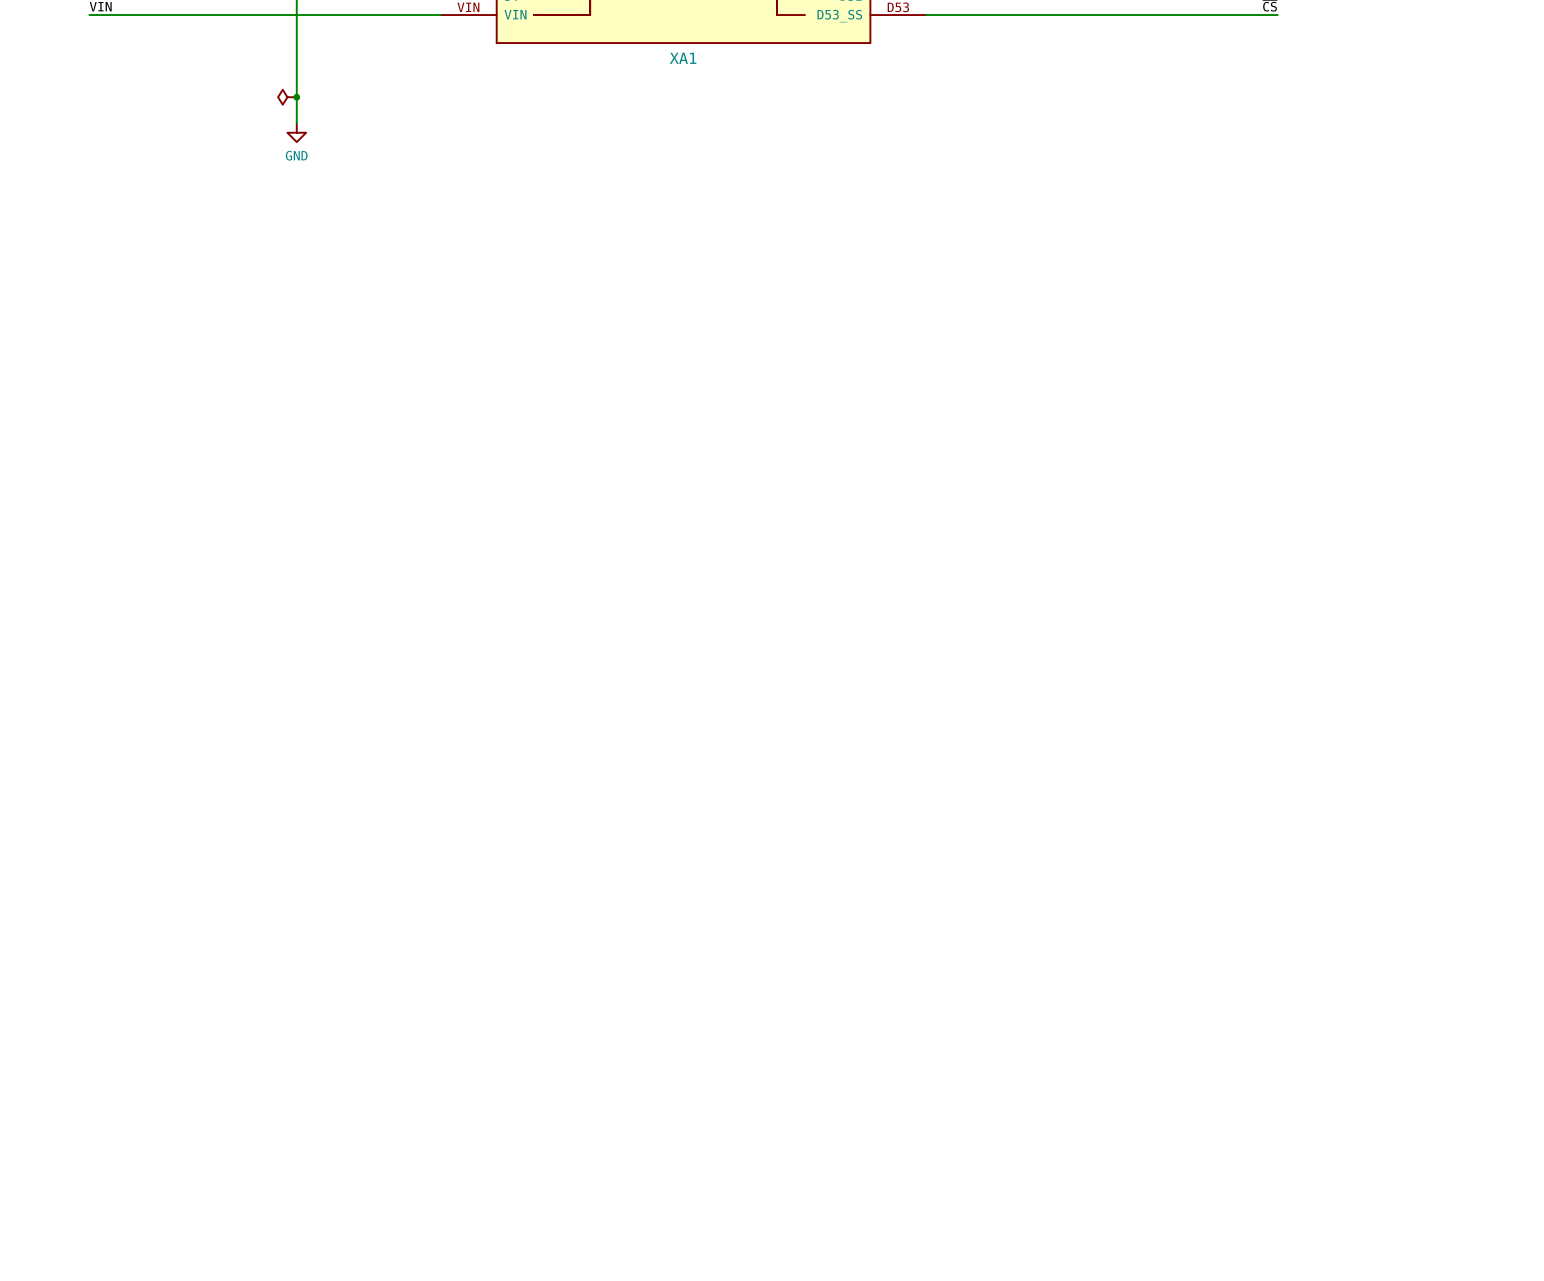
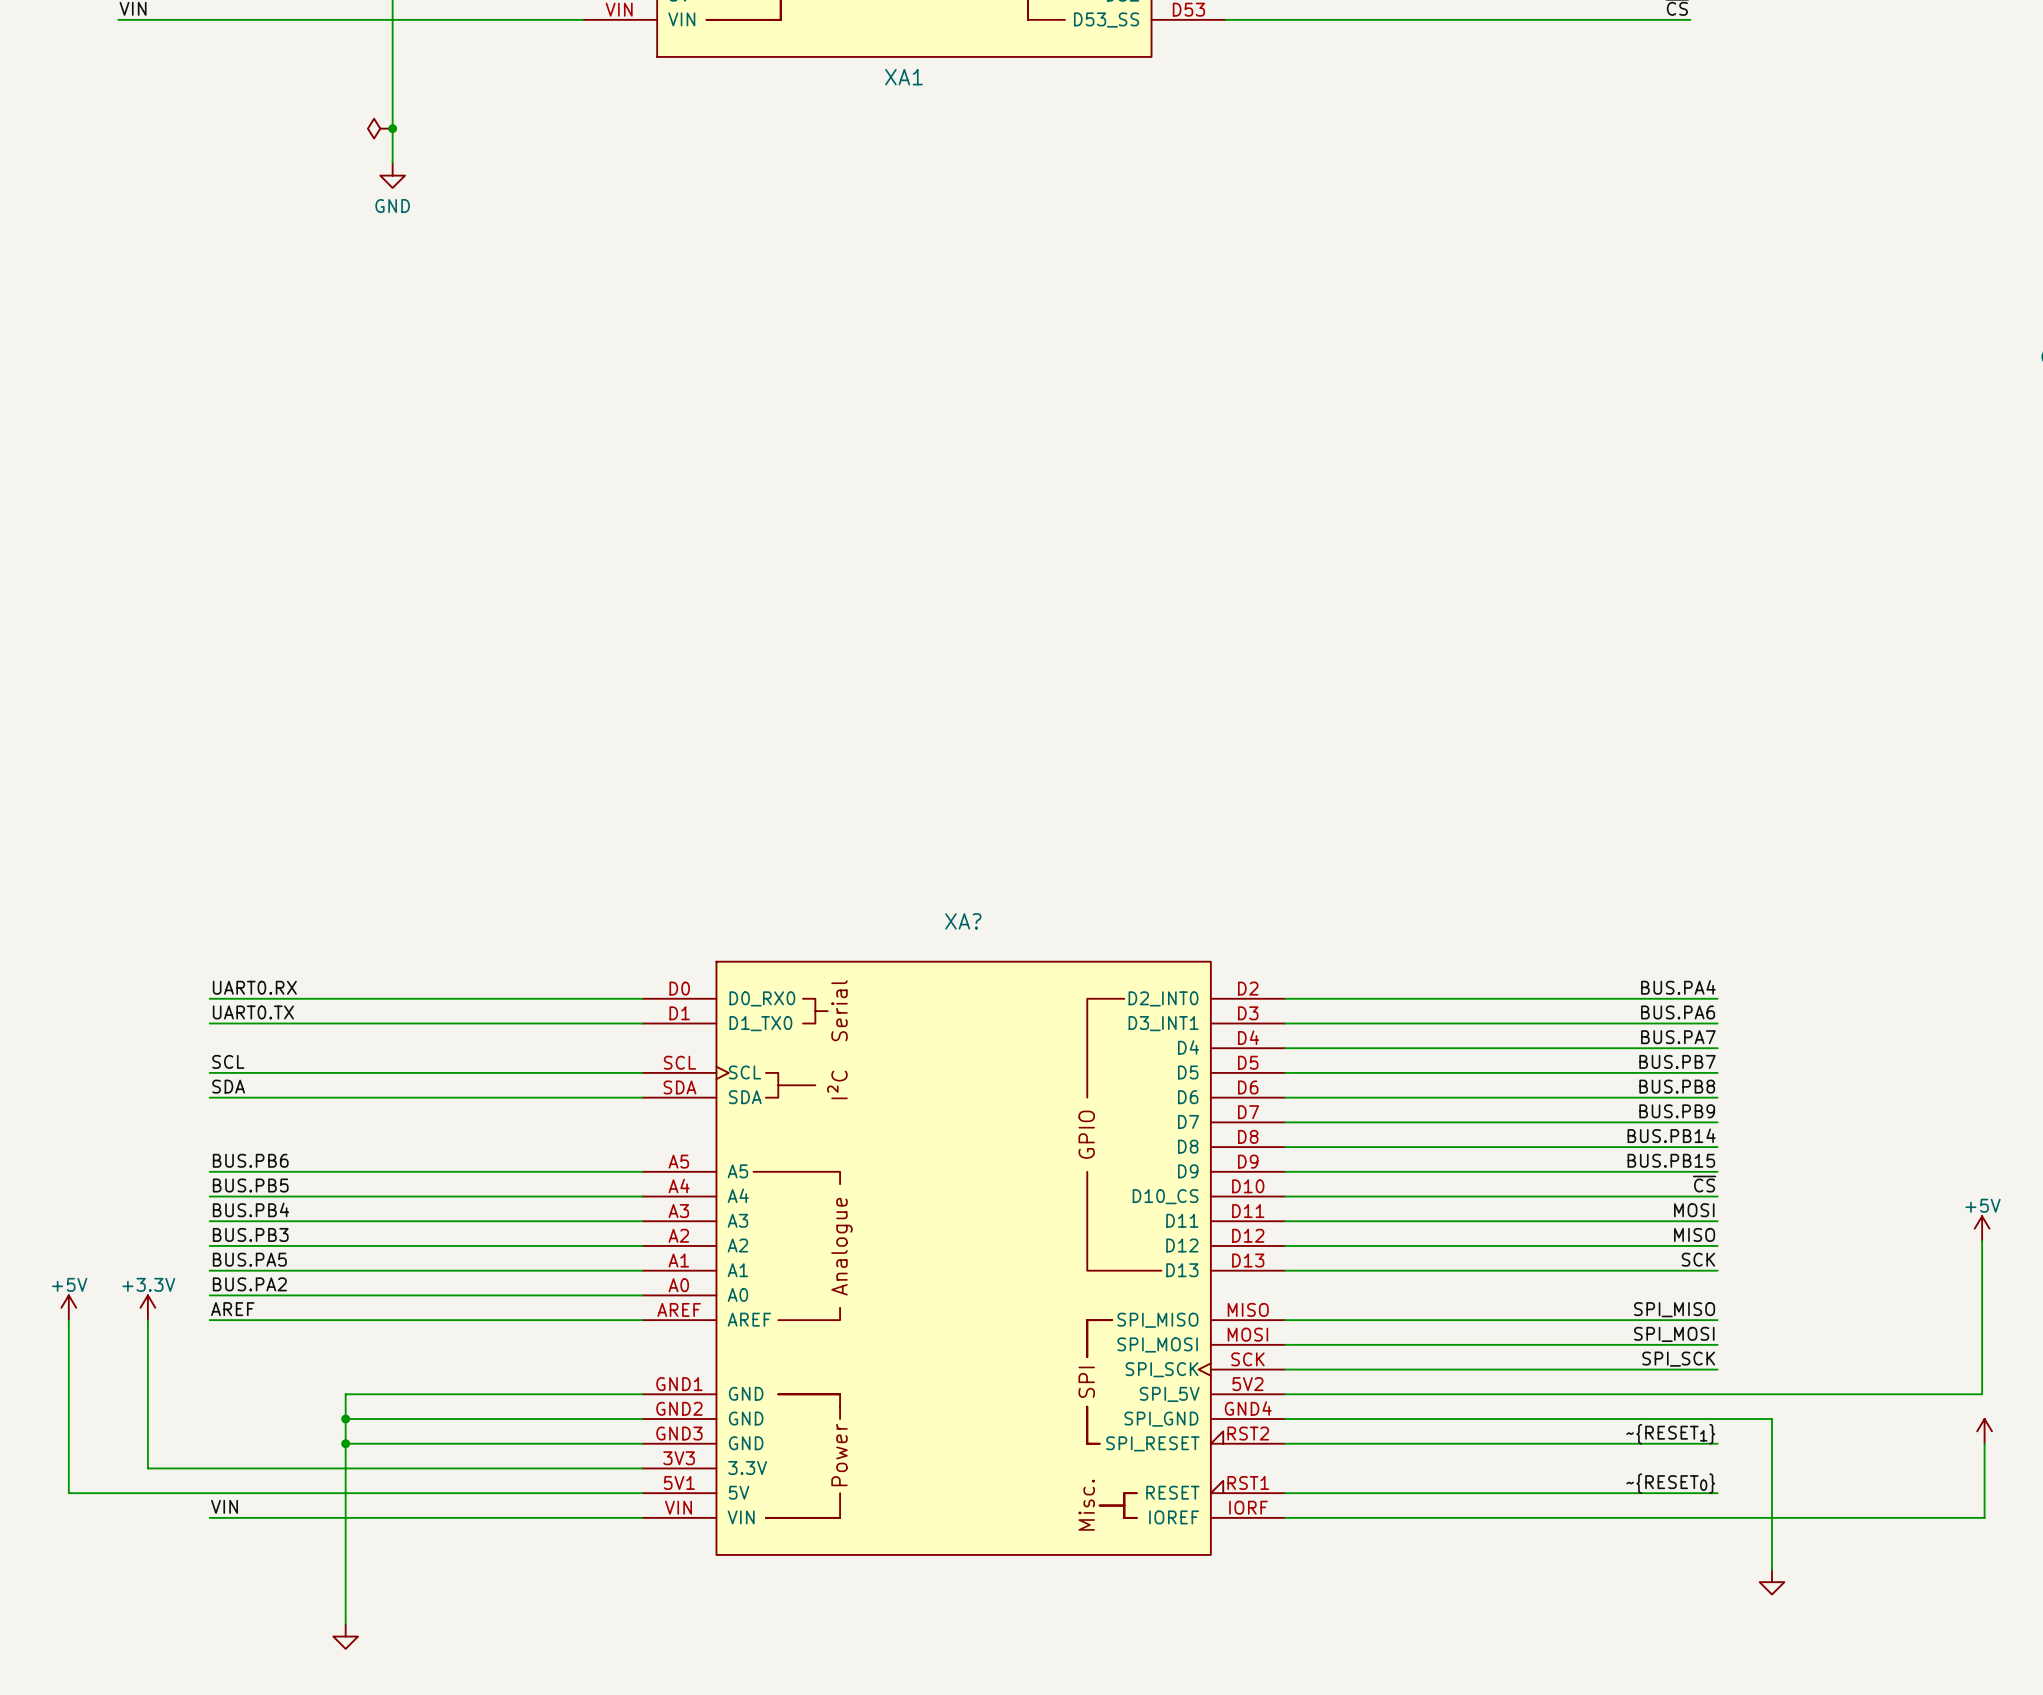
label: none -> UART0.RX (254, 987)
label: none -> BUS.PA4 (1678, 987)
wire: none -> (209, 998) (642, 998)
wire: none -> (1285, 998) (1717, 998)
label: none -> UART0.TX (253, 1012)
label: none -> BUS.PA6 (1678, 1012)
wire: none -> (209, 1023) (642, 1023)
wire: none -> (1285, 1023) (1717, 1023)
label: none -> BUS.PA7 (1678, 1037)
wire: none -> (1285, 1048) (1717, 1048)
label: none -> SCL (228, 1061)
label: none -> BUS.PB7 (1677, 1061)
wire: none -> (209, 1072) (642, 1072)
wire: none -> (1285, 1072) (1717, 1072)
label: none -> SDA (228, 1086)
label: none -> BUS.PB8 (1677, 1086)
wire: none -> (209, 1097) (642, 1097)
wire: none -> (1285, 1097) (1717, 1097)
label: none -> BUS.PB9 (1677, 1111)
wire: none -> (1285, 1122) (1717, 1122)
label: none -> BUS.PB14 (1671, 1135)
wire: none -> (1285, 1147) (1717, 1147)
label: none -> BUS.PB6 (250, 1160)
label: none -> BUS.PB15 (1671, 1160)
wire: none -> (209, 1171) (642, 1171)
wire: none -> (1285, 1171) (1717, 1171)
label: none -> ~{CS} (1704, 1184)
label: none -> BUS.PB5 (250, 1185)
wire: none -> (209, 1196) (642, 1196)
wire: none -> (1285, 1196) (1717, 1196)
label: none -> BUS.PB4 (251, 1209)
label: none -> MOSI (1694, 1210)
wire: none -> (209, 1221) (642, 1221)
wire: none -> (1285, 1221) (1717, 1221)
power symbol: none -> +5V (1982, 1228)
label: none -> BUS.PB3 (250, 1234)
label: none -> MISO (1694, 1234)
wire: none -> (1982, 1241) (1982, 1394) (1285, 1394)
wire: none -> (209, 1245) (642, 1245)
wire: none -> (1285, 1245) (1717, 1245)
XA?: none -> (963, 1258)
label: none -> BUS.PA5 (249, 1259)
label: none -> SCK (1698, 1259)
wire: none -> (209, 1270) (642, 1270)
wire: none -> (1285, 1270) (1717, 1270)
label: none -> BUS.PA2 (249, 1284)
wire: none -> (209, 1295) (642, 1295)
power symbol: none -> +5V (68, 1307)
power symbol: none -> +3.3V (147, 1307)
label: none -> AREF (232, 1309)
label: none -> SPI_MISO (1674, 1309)
wire: none -> (68, 1320) (68, 1493) (642, 1493)
wire: none -> (147, 1320) (147, 1468) (642, 1468)
wire: none -> (209, 1320) (642, 1320)
wire: none -> (1285, 1320) (1717, 1320)
label: none -> SPI_MOSI (1674, 1334)
wire: none -> (1285, 1344) (1717, 1344)
label: none -> SPI_SCK (1678, 1359)
wire: none -> (1285, 1369) (1717, 1369)
wire: none -> (642, 1394) (345, 1394) (345, 1624)
wire: none -> (345, 1419) (642, 1419)
junction: none -> (345, 1419)
wire: none -> (1285, 1419) (1772, 1419) (1772, 1569)
power symbol: none -> (1984, 1431)
label: none -> ~{RESET1} (1670, 1434)
wire: none -> (345, 1443) (642, 1443)
junction: none -> (345, 1443)
wire: none -> (1285, 1443) (1717, 1443)
wire: none -> (1984, 1443) (1984, 1517) (1285, 1517)
label: none -> ~{RESET0} (1670, 1483)
wire: none -> (1285, 1493) (1717, 1493)
label: none -> VIN (224, 1506)
wire: none -> (209, 1517) (642, 1517)
power symbol: none -> (1772, 1582)
power symbol: none -> (345, 1636)

